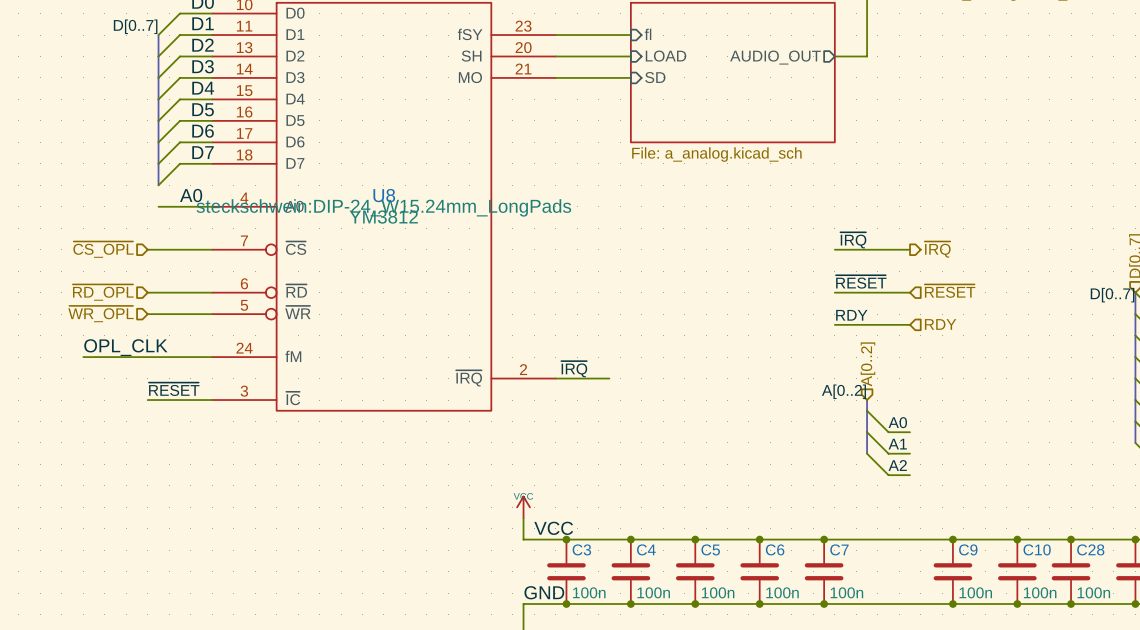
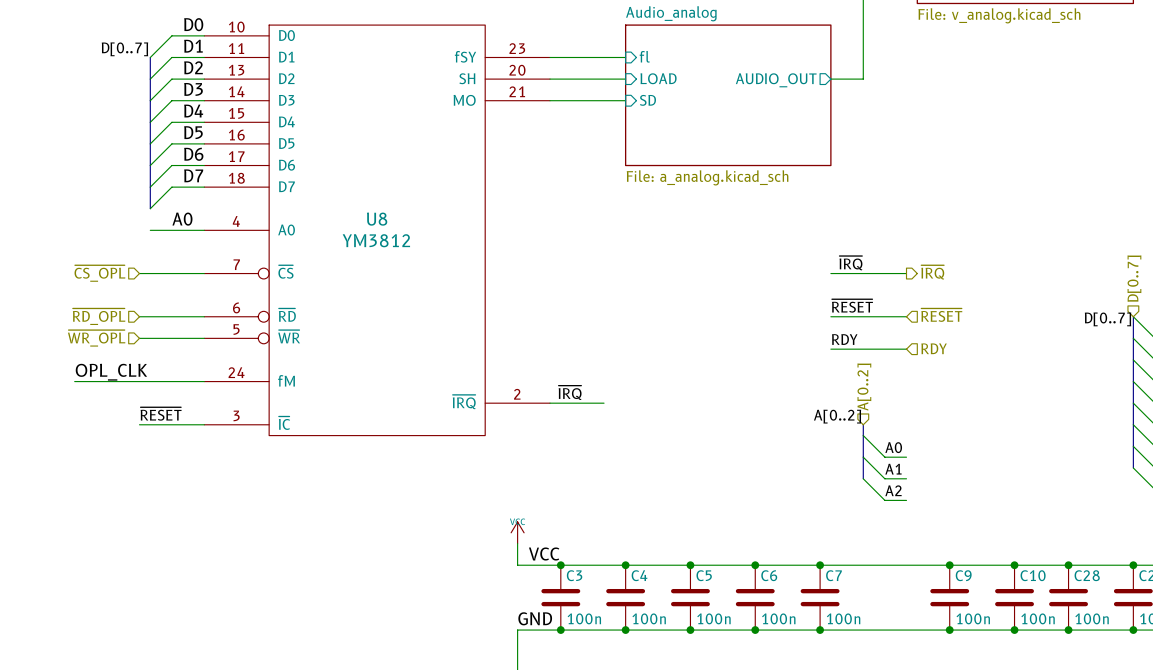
U8 text: steckschwein:DIP-24_W15.24mm_LongPads (383, 207) -> none

